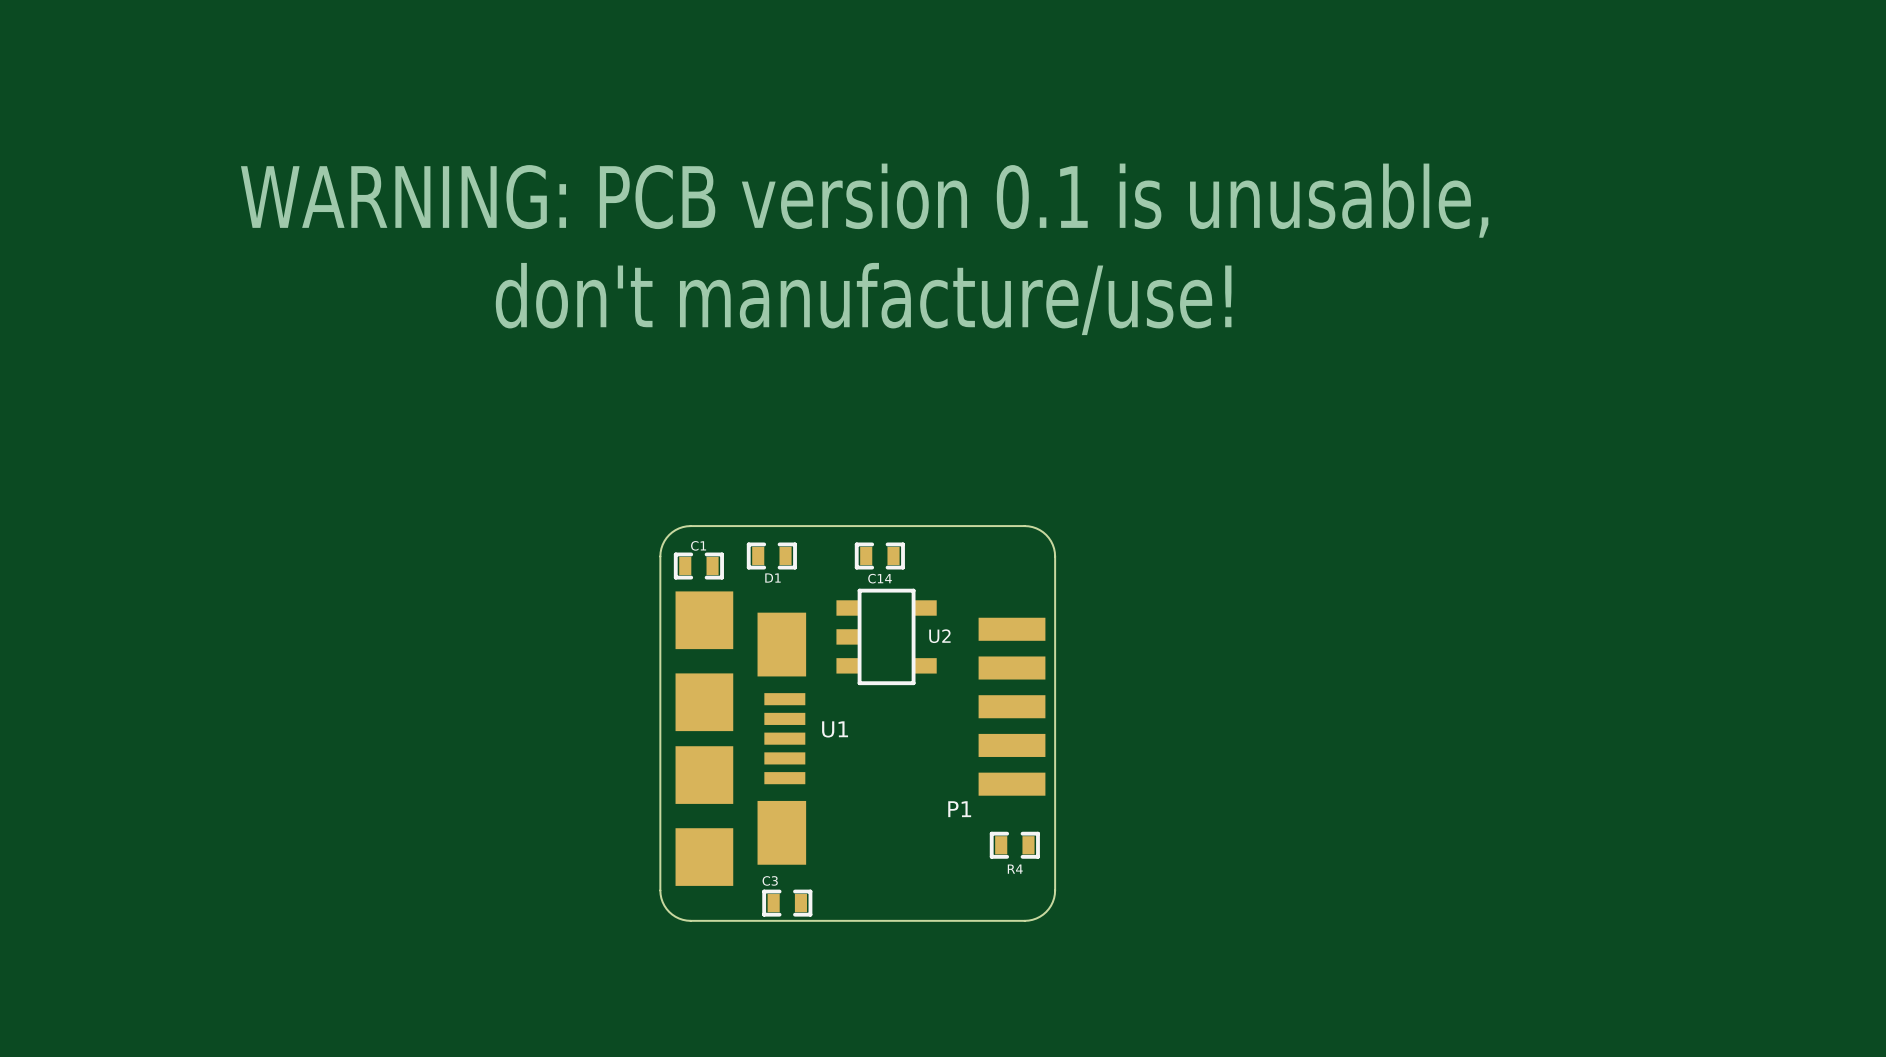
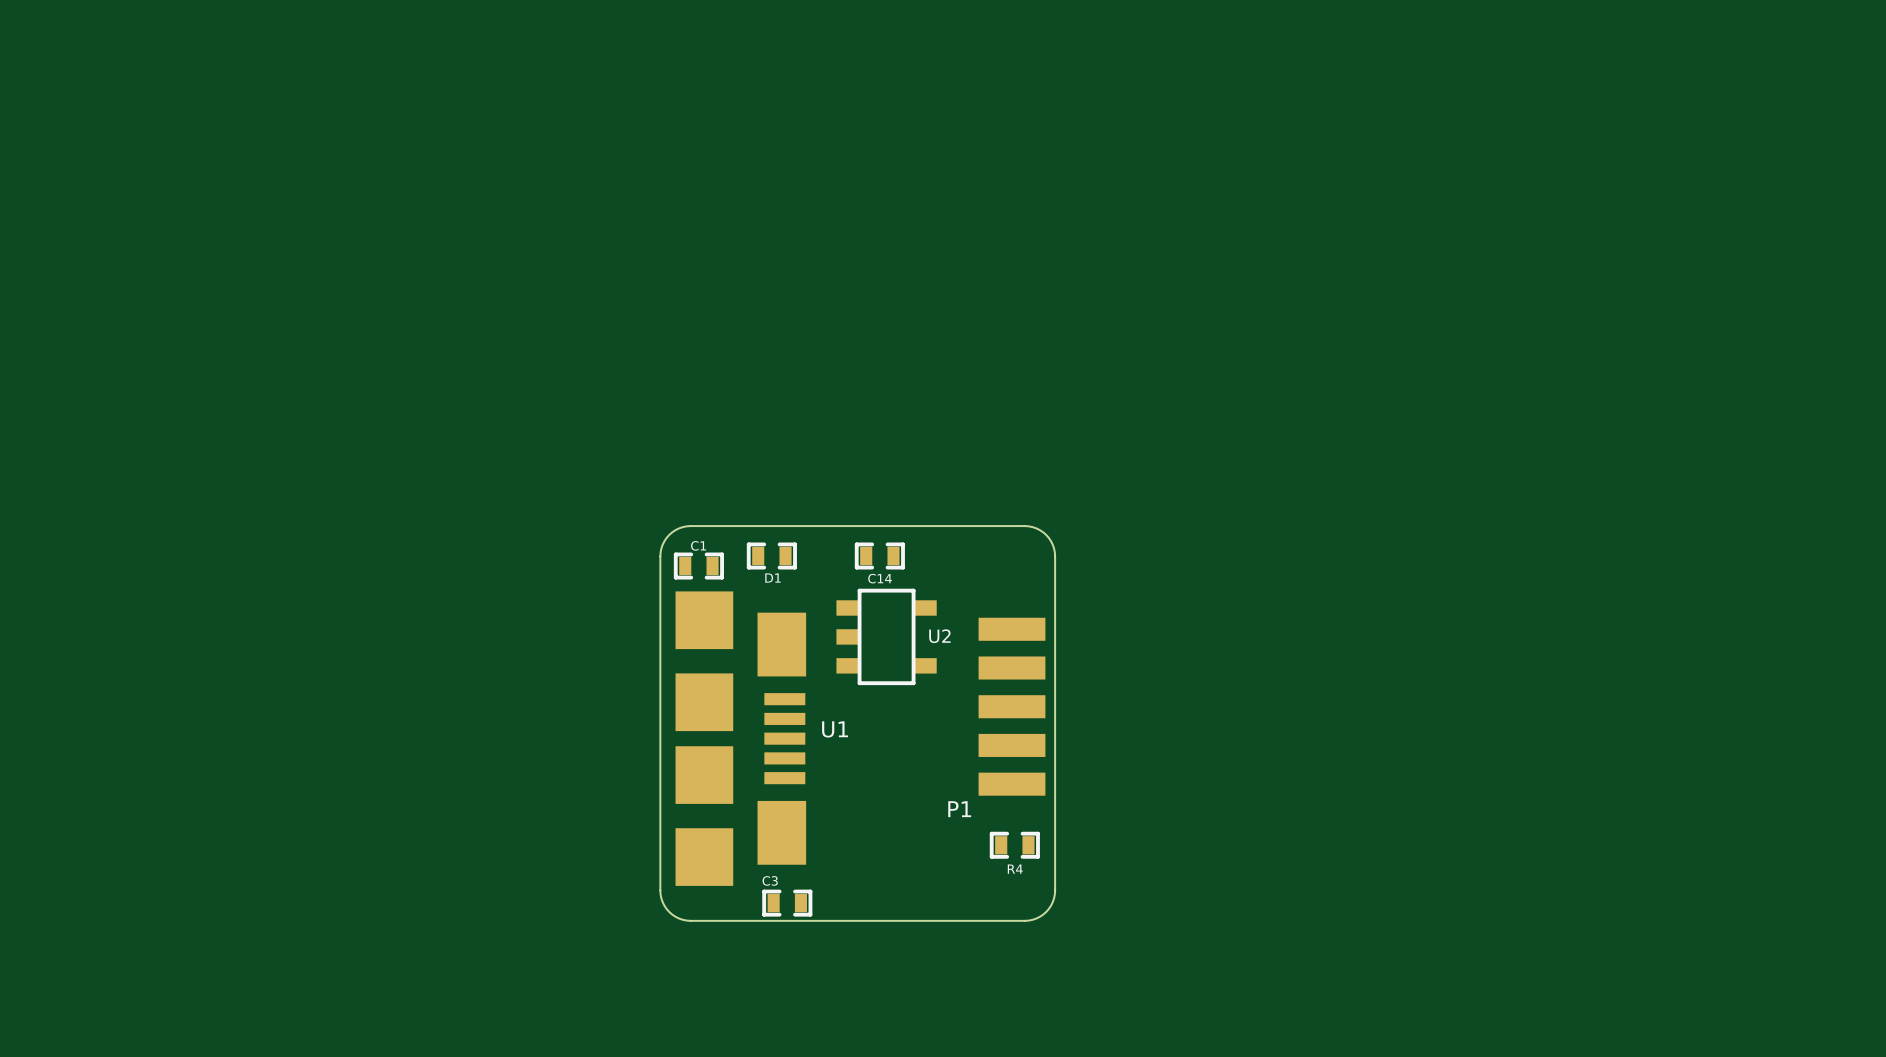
text: WARNING: PCB version 0.1 is unusable, (864, 200) -> none
text: don't manufacture/use! (863, 299) -> none

